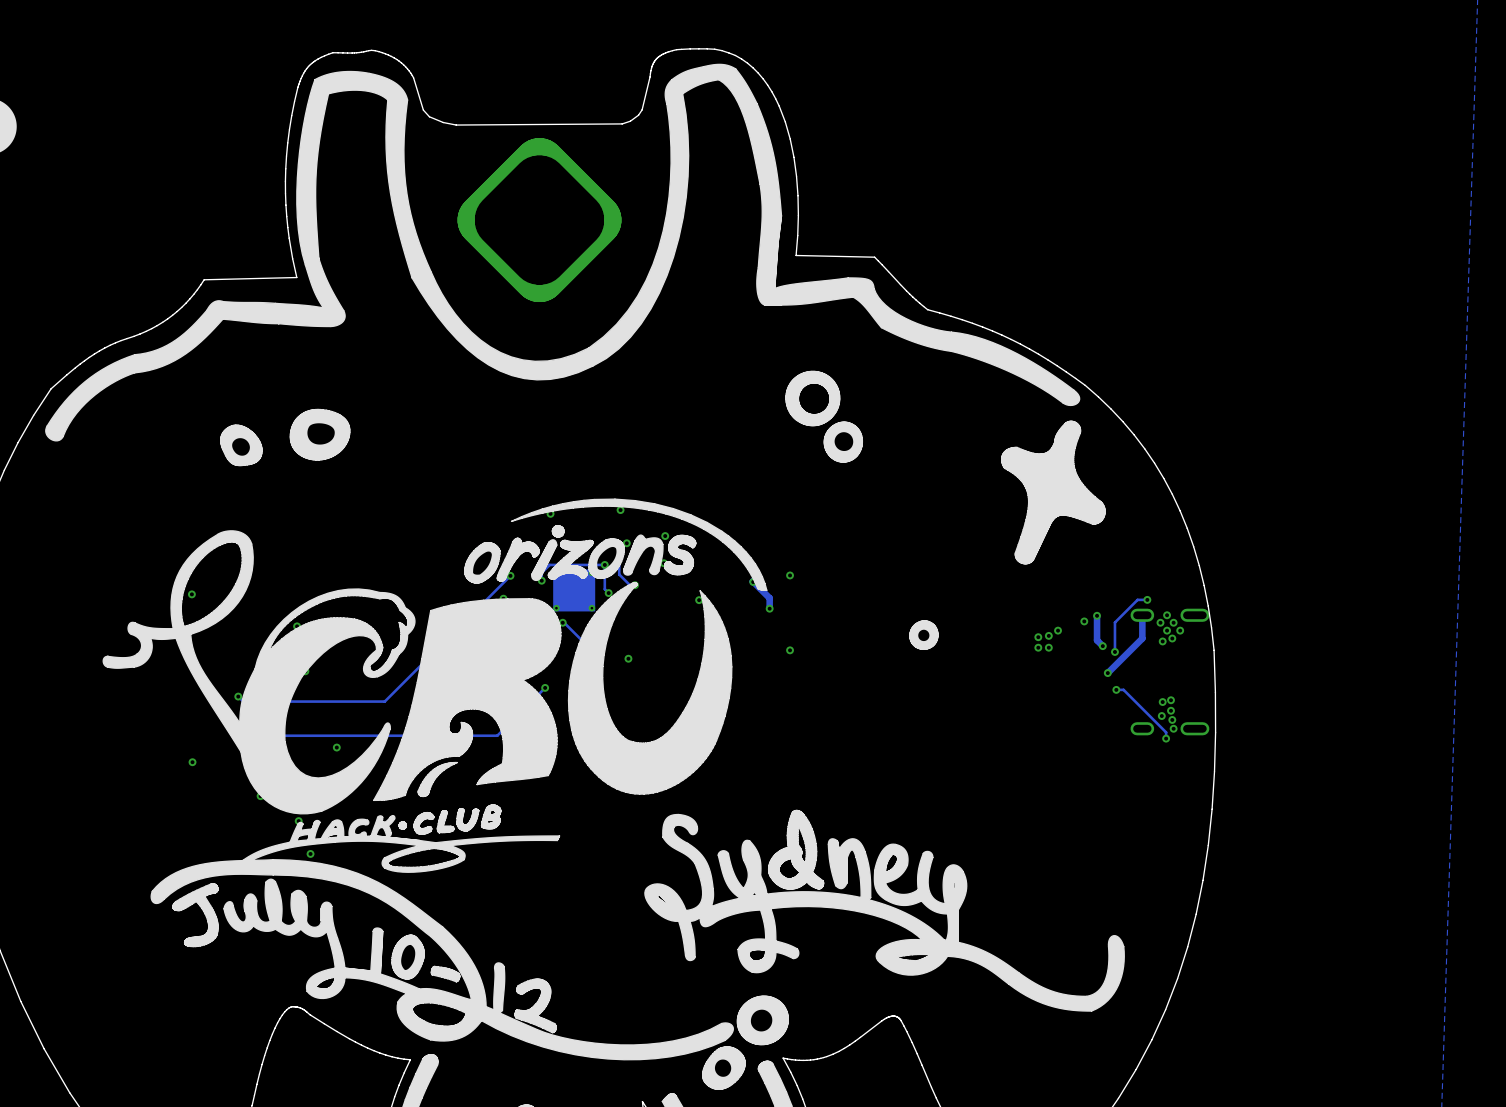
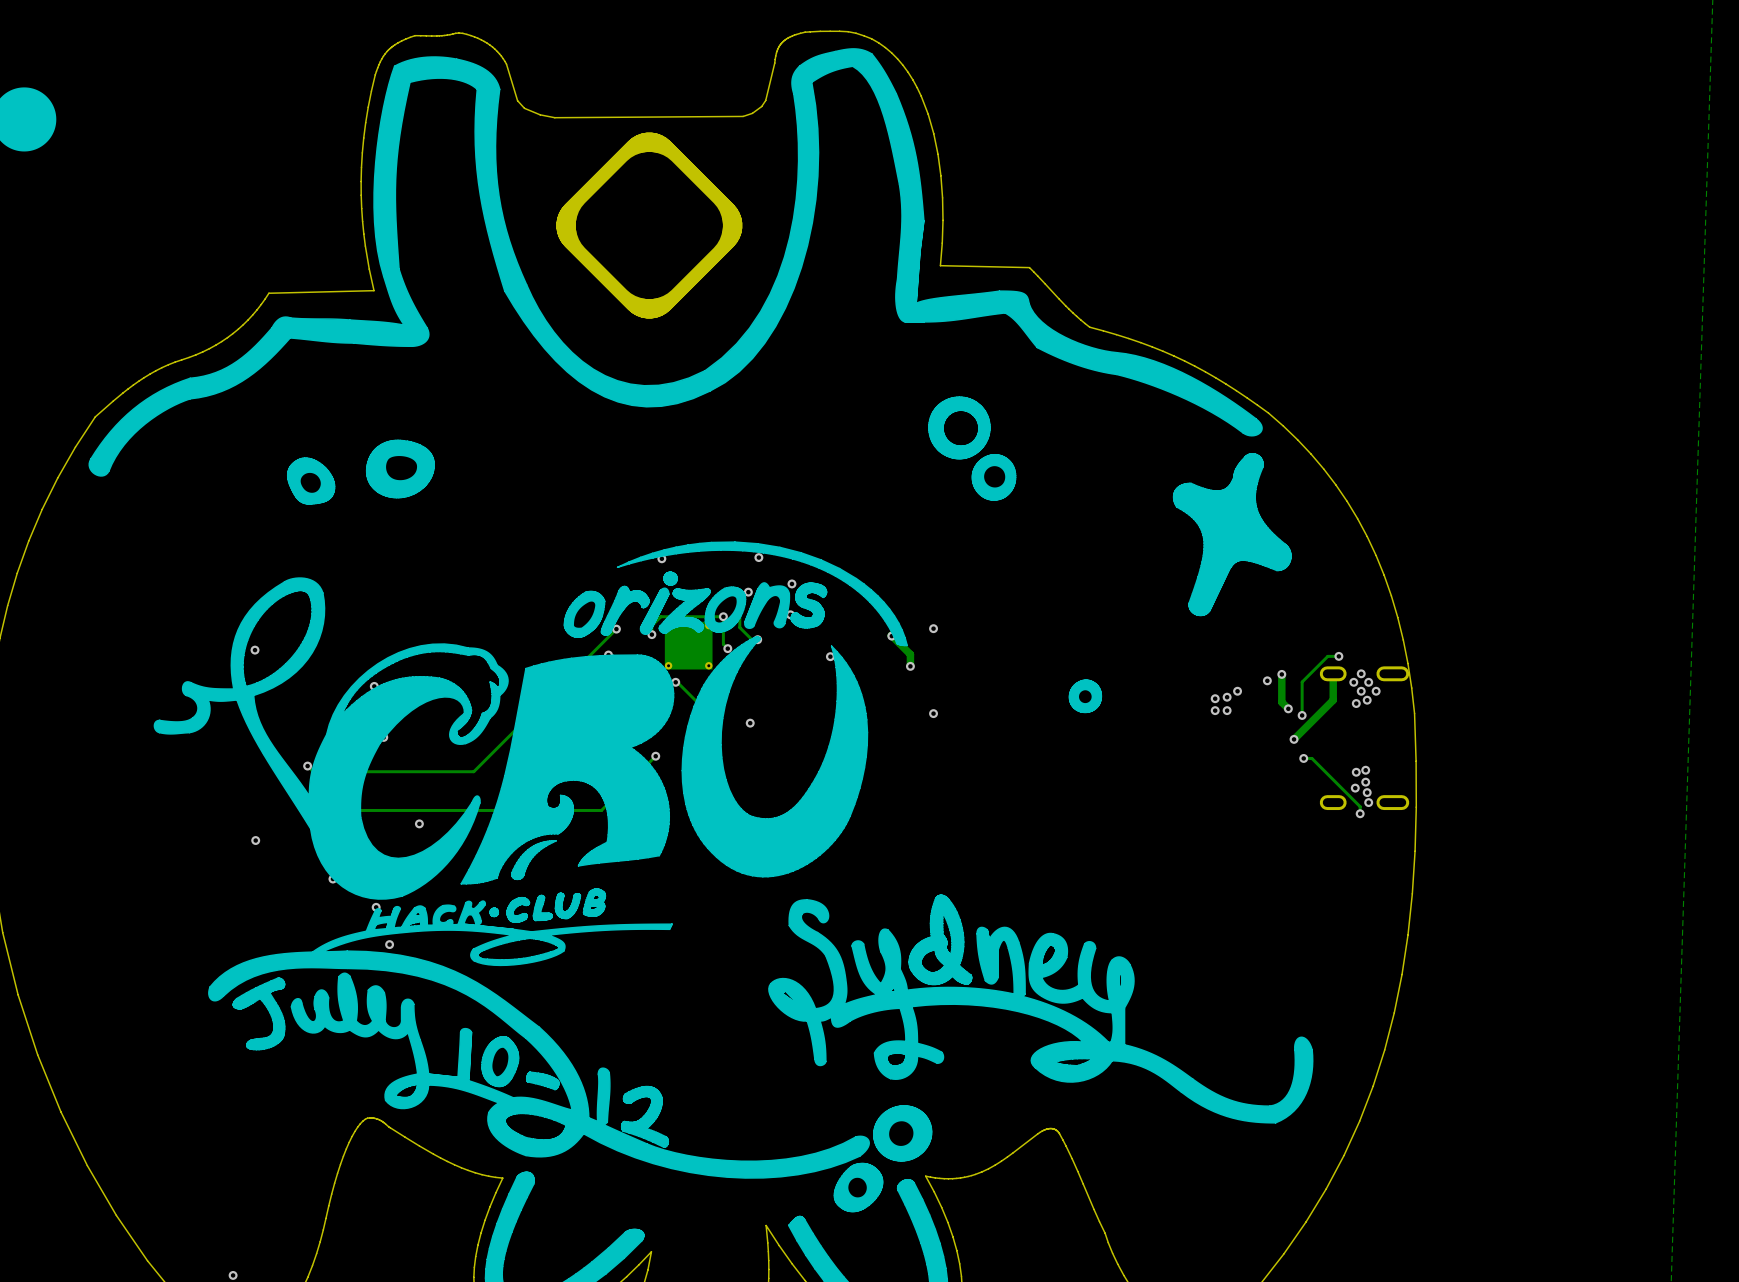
via position: (620, 510) -> (758, 557)

